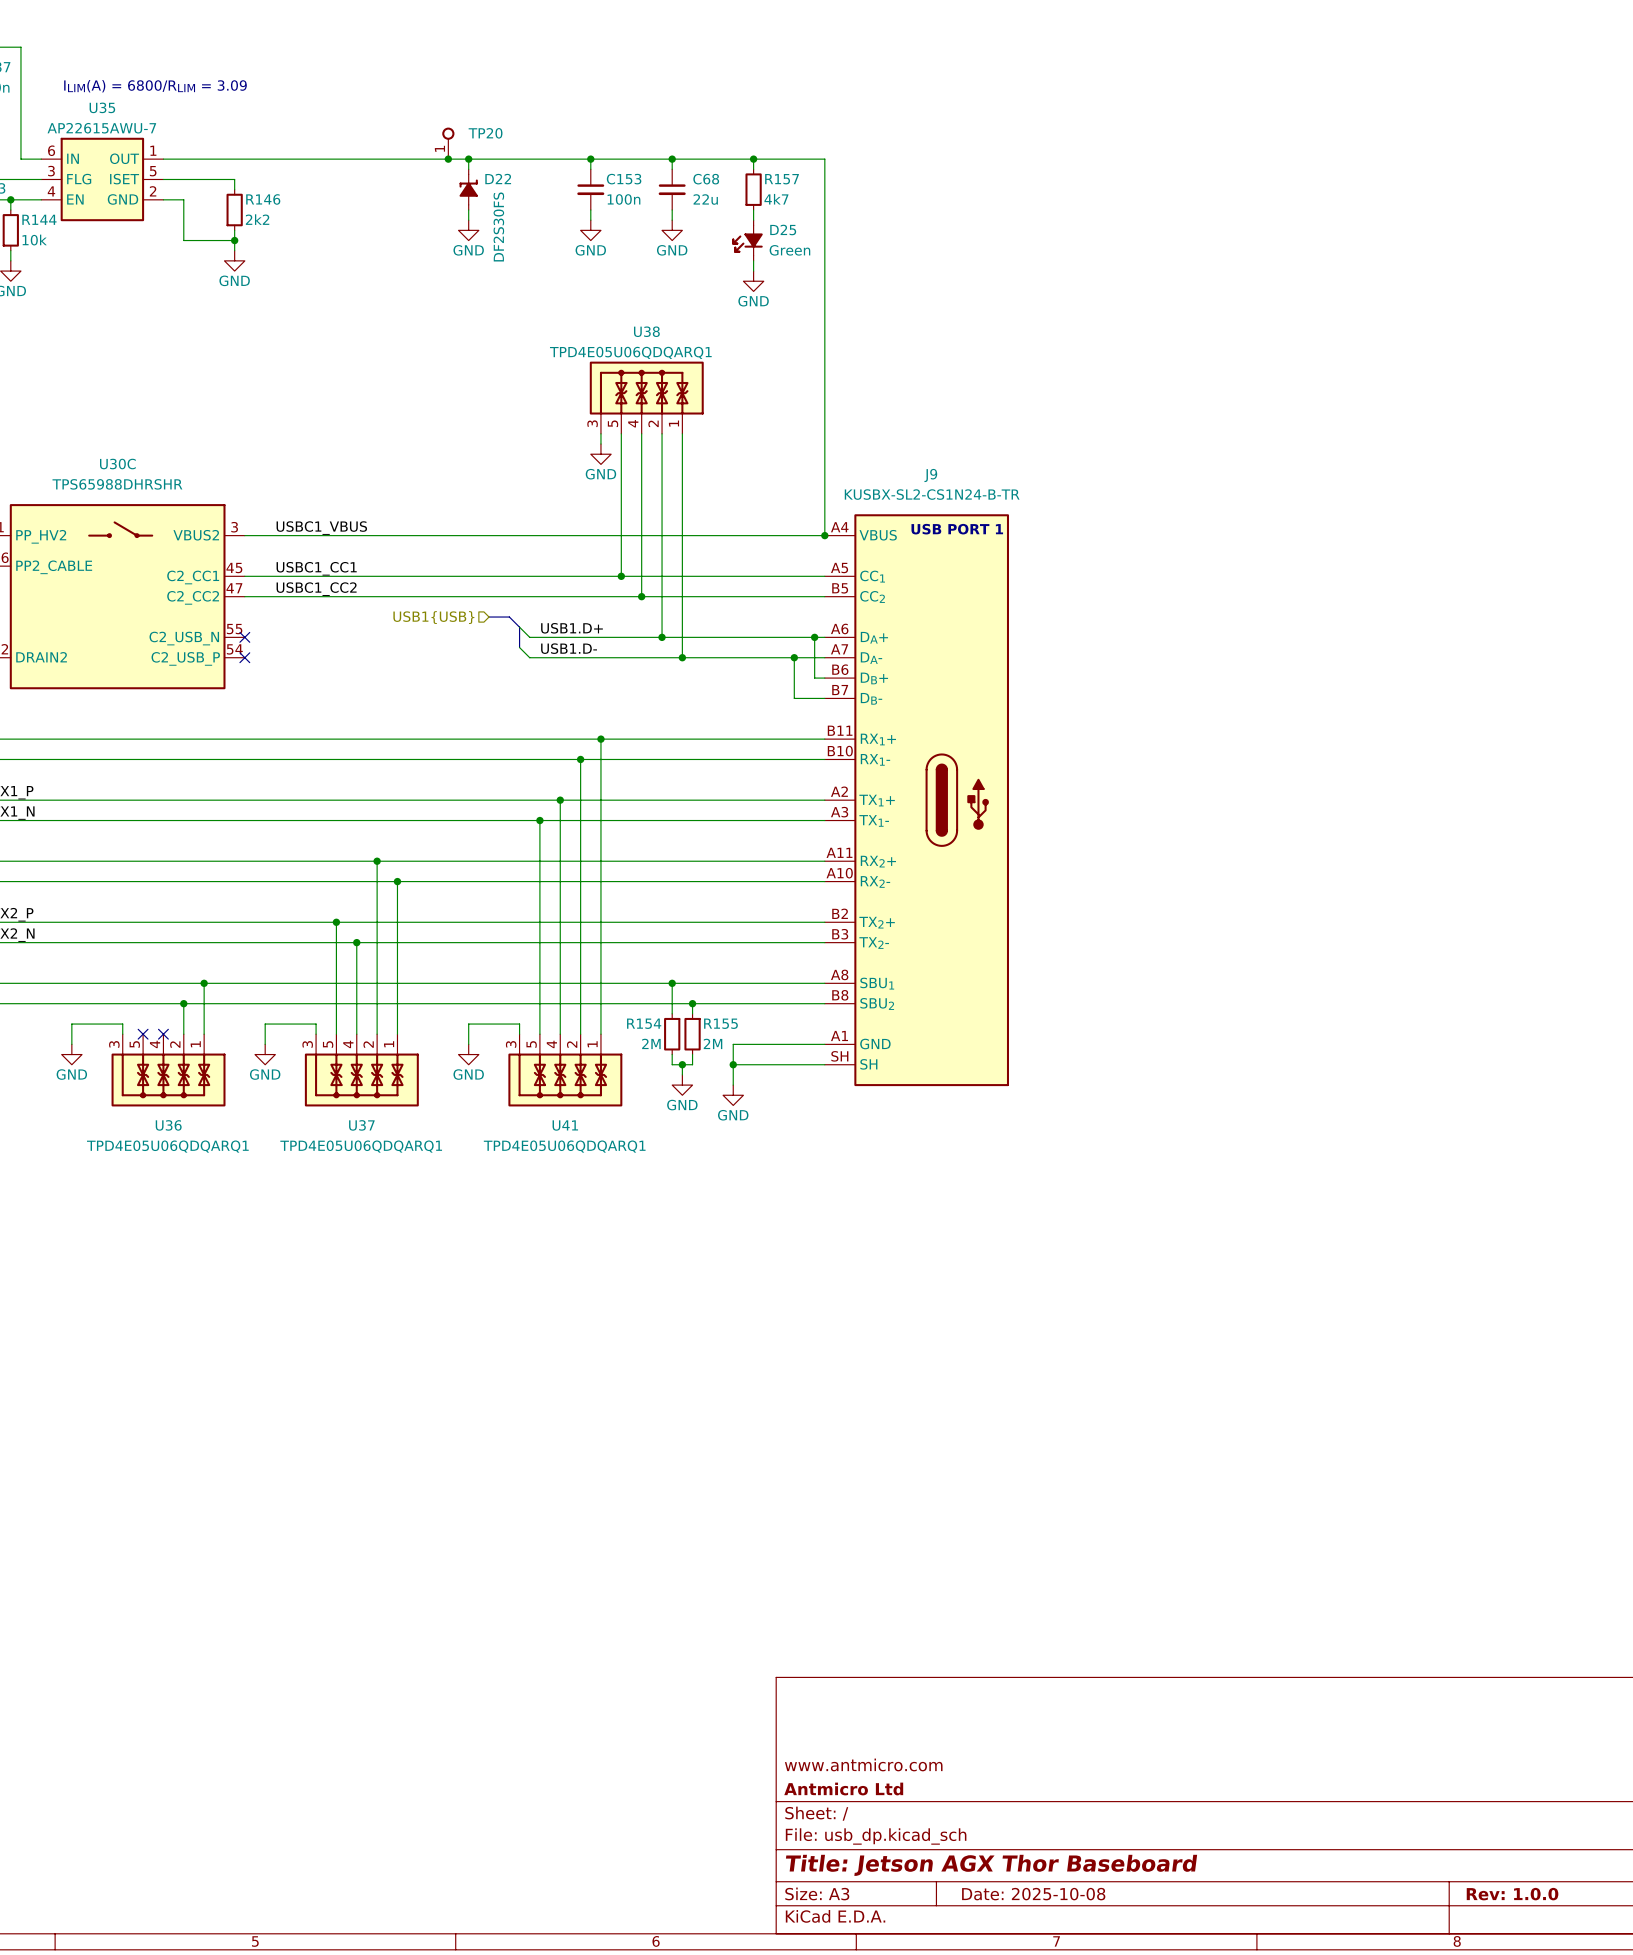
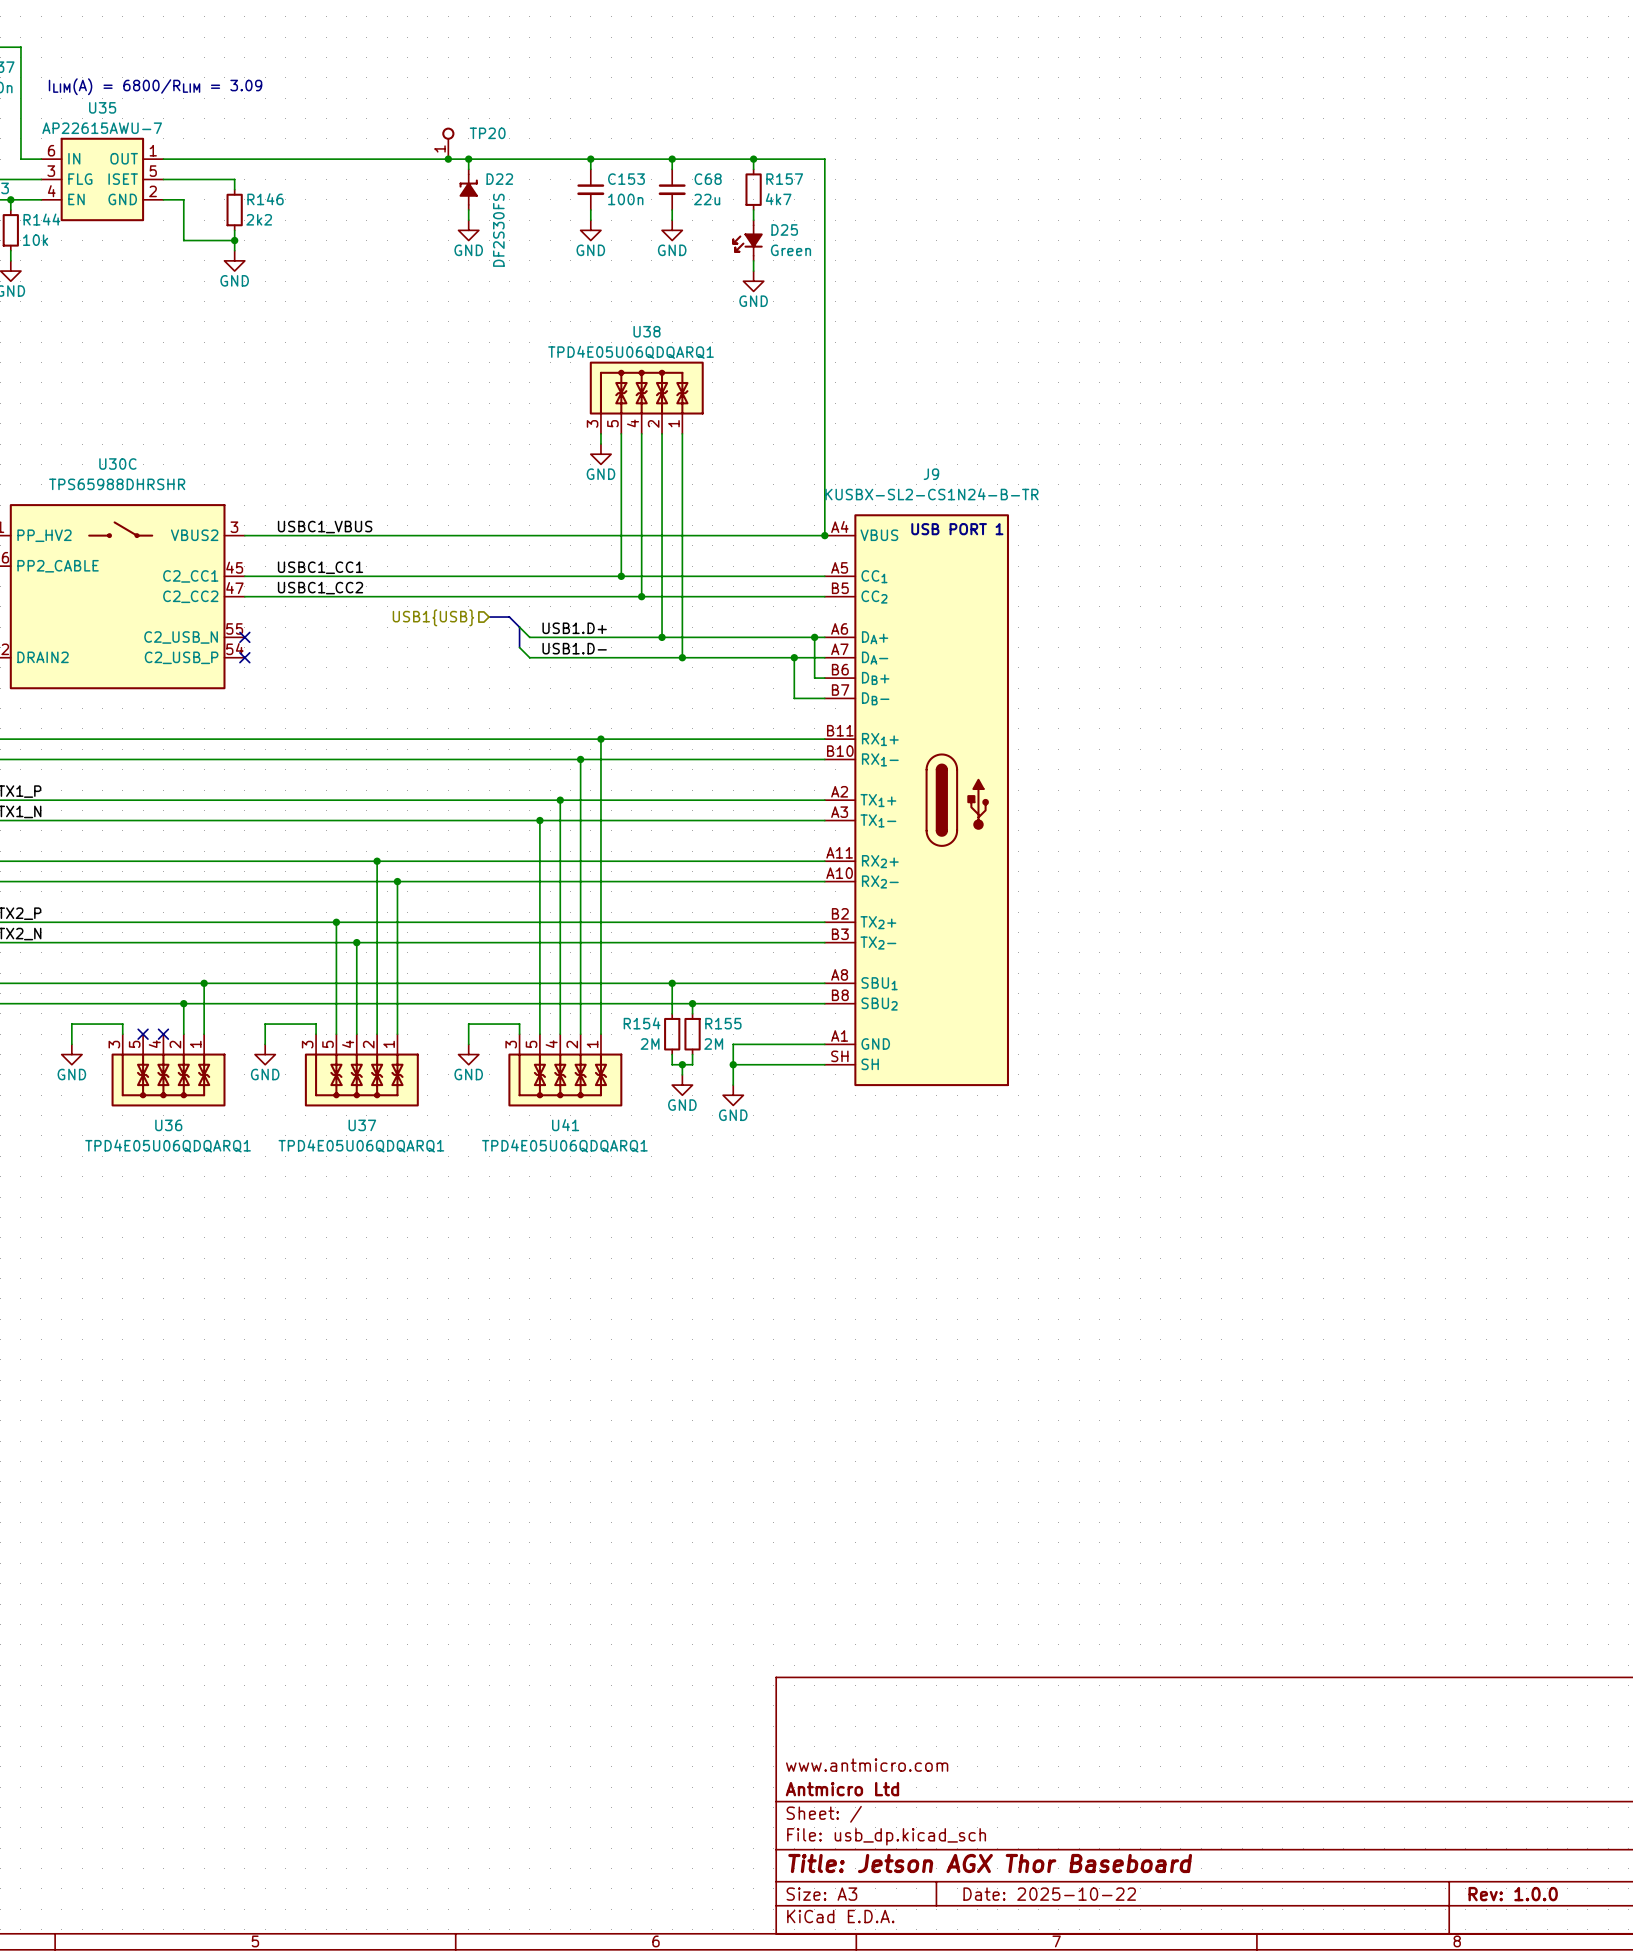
title block: Date: 2025-10-08 (1033, 1894) -> Date: 2025-10-22 (1049, 1894)

